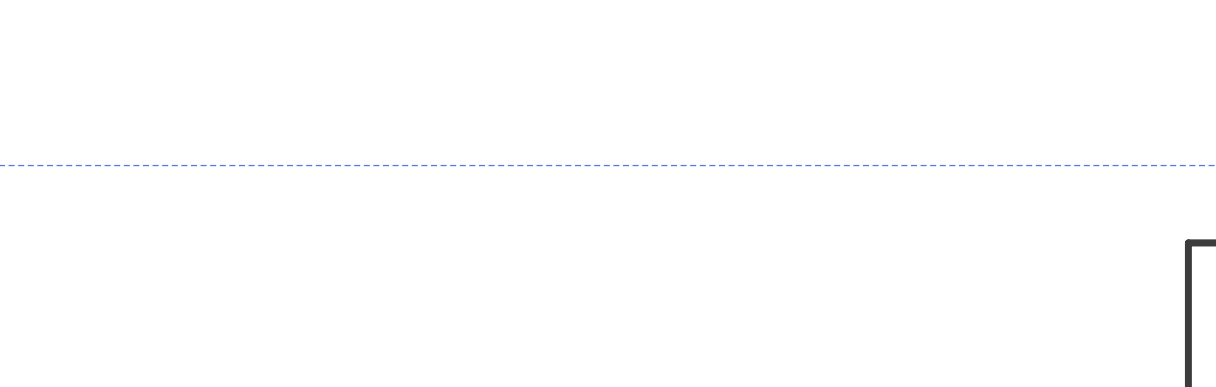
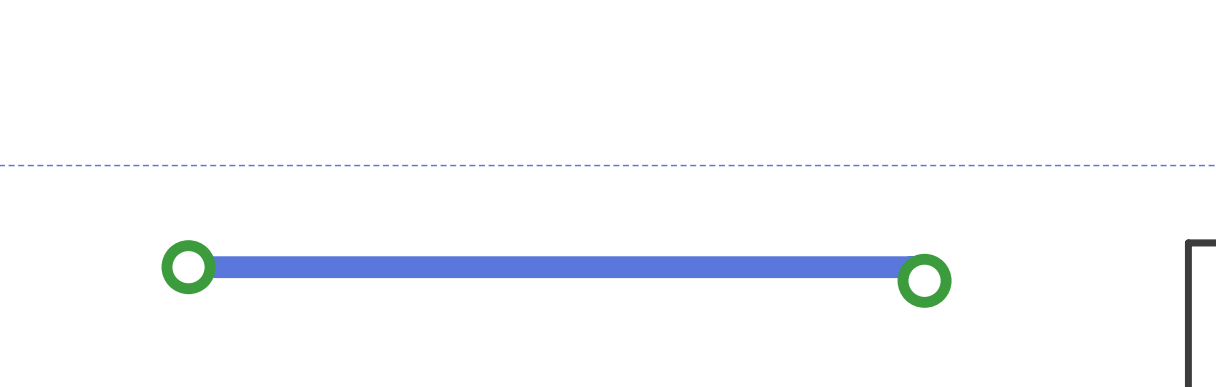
track: none -> (188, 267) (910, 267) (924, 280)
via: none -> (188, 267)
via: none -> (924, 280)

